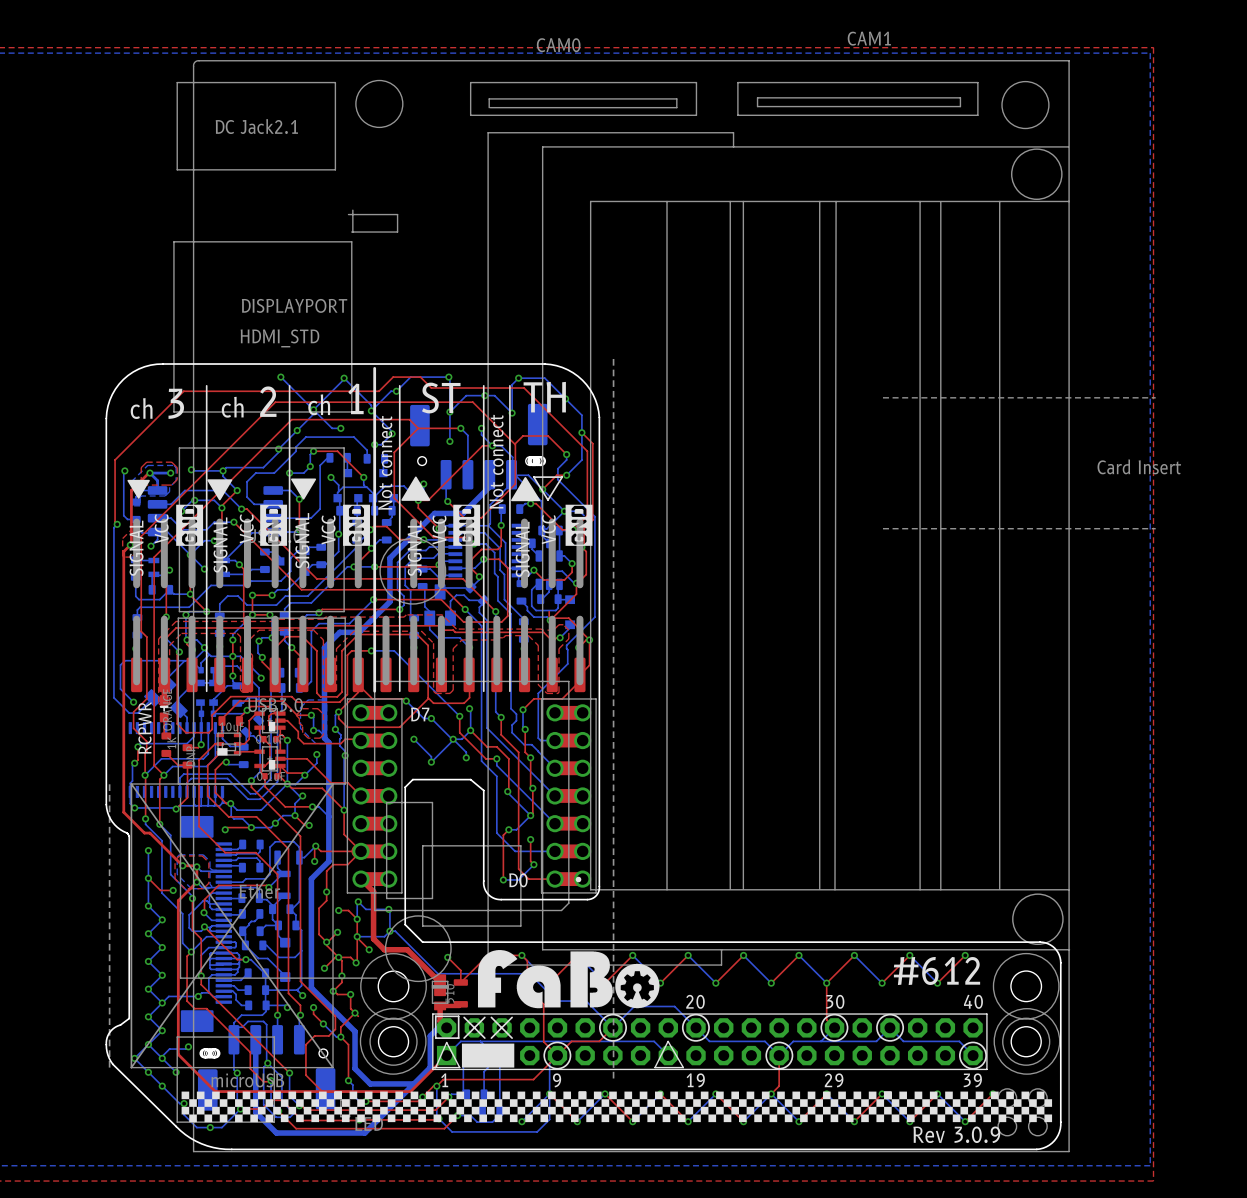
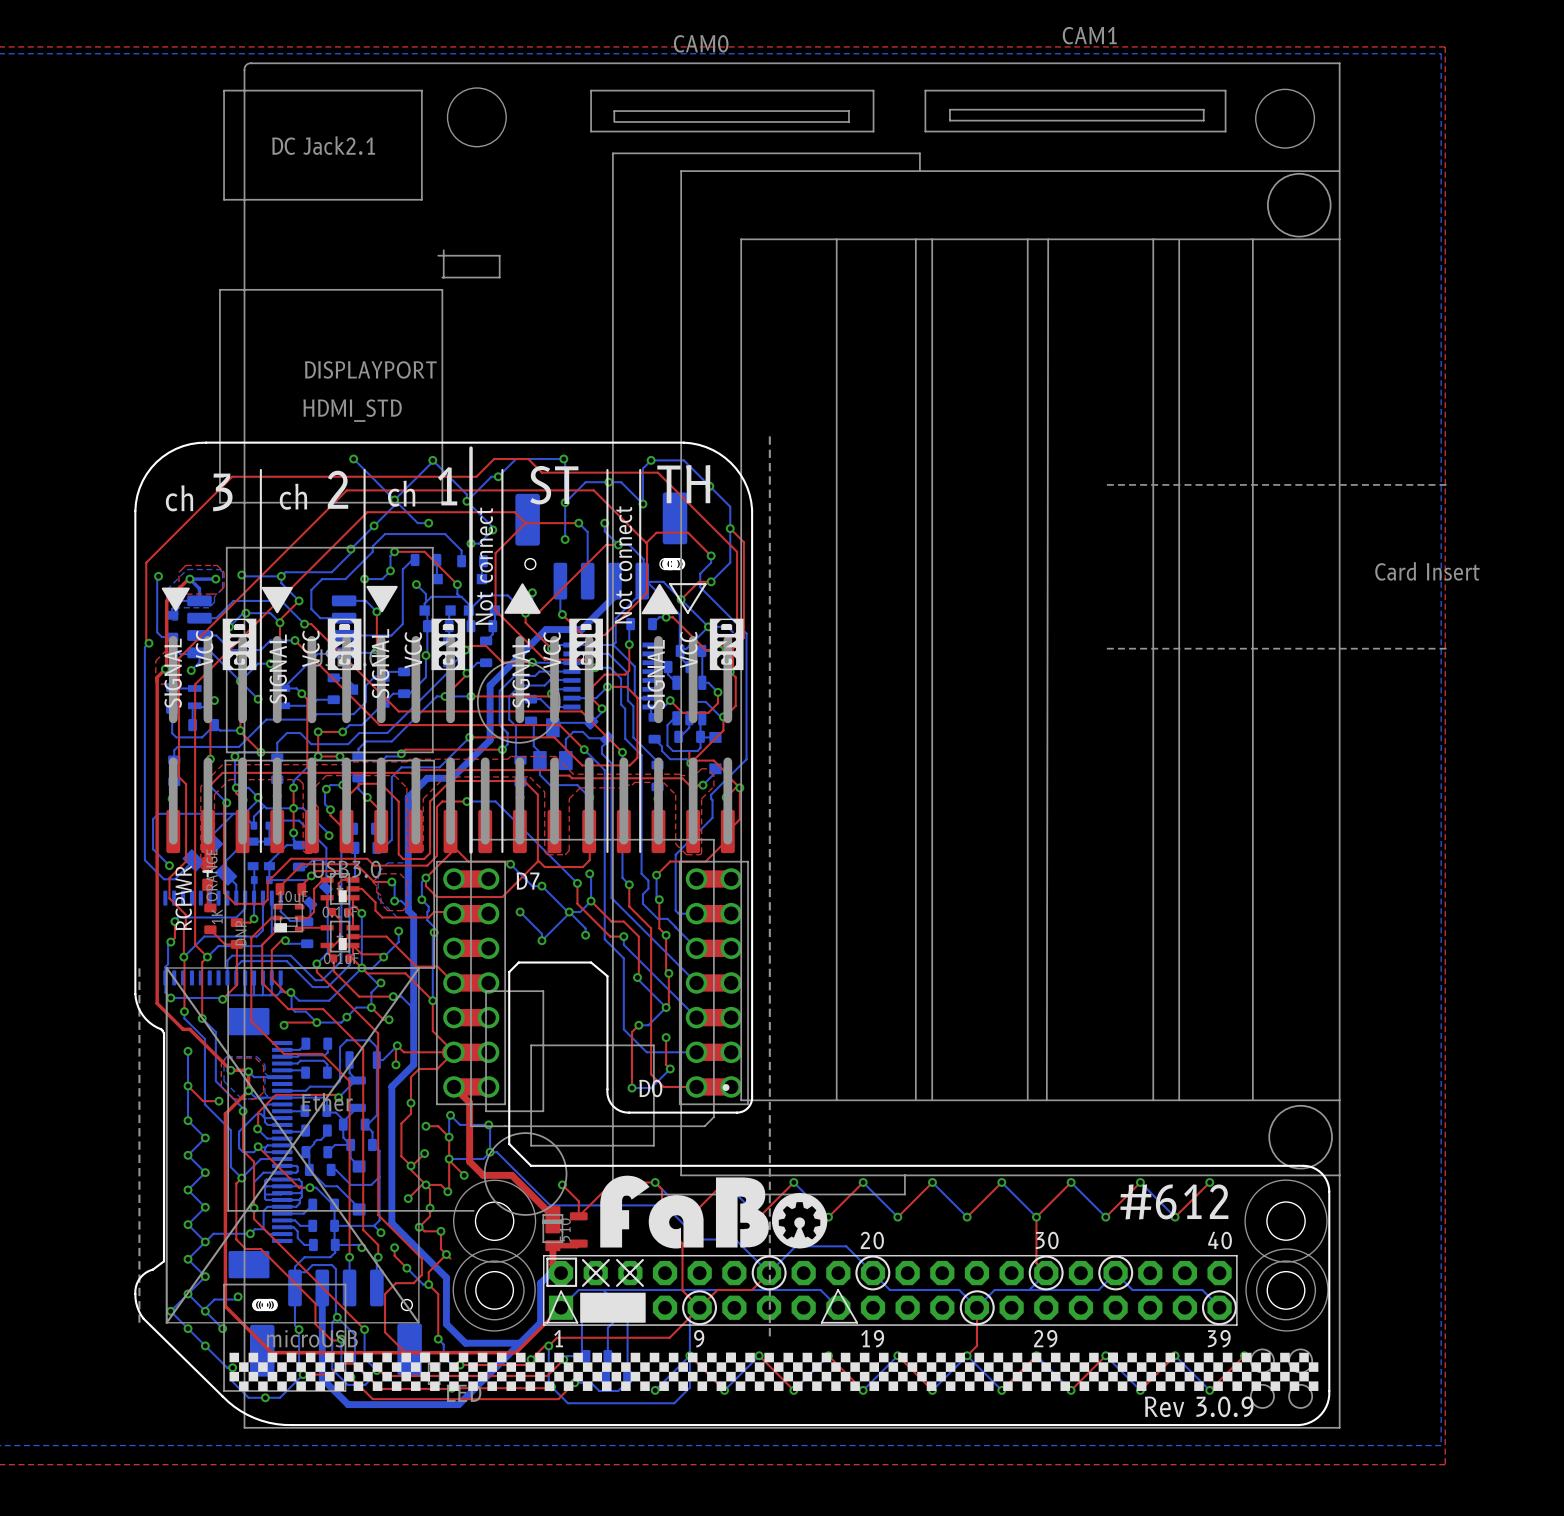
bottom track: (246, 732) (260, 742) -> none

